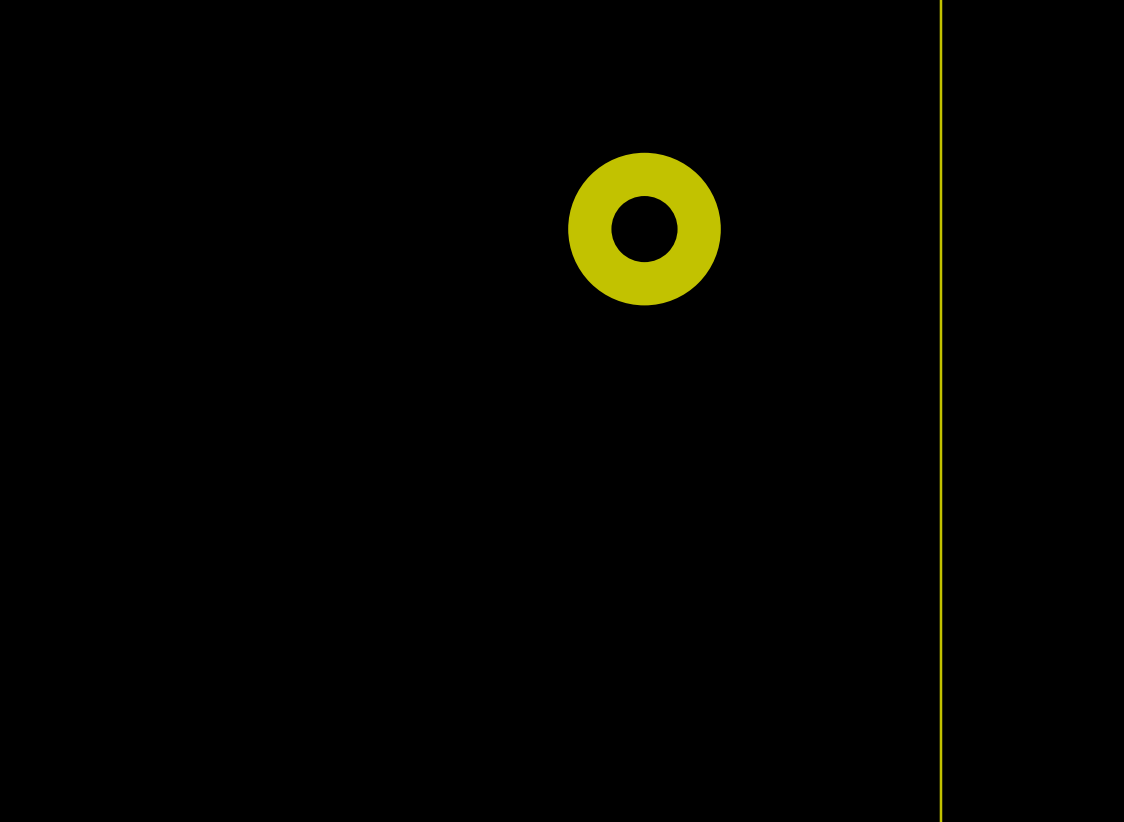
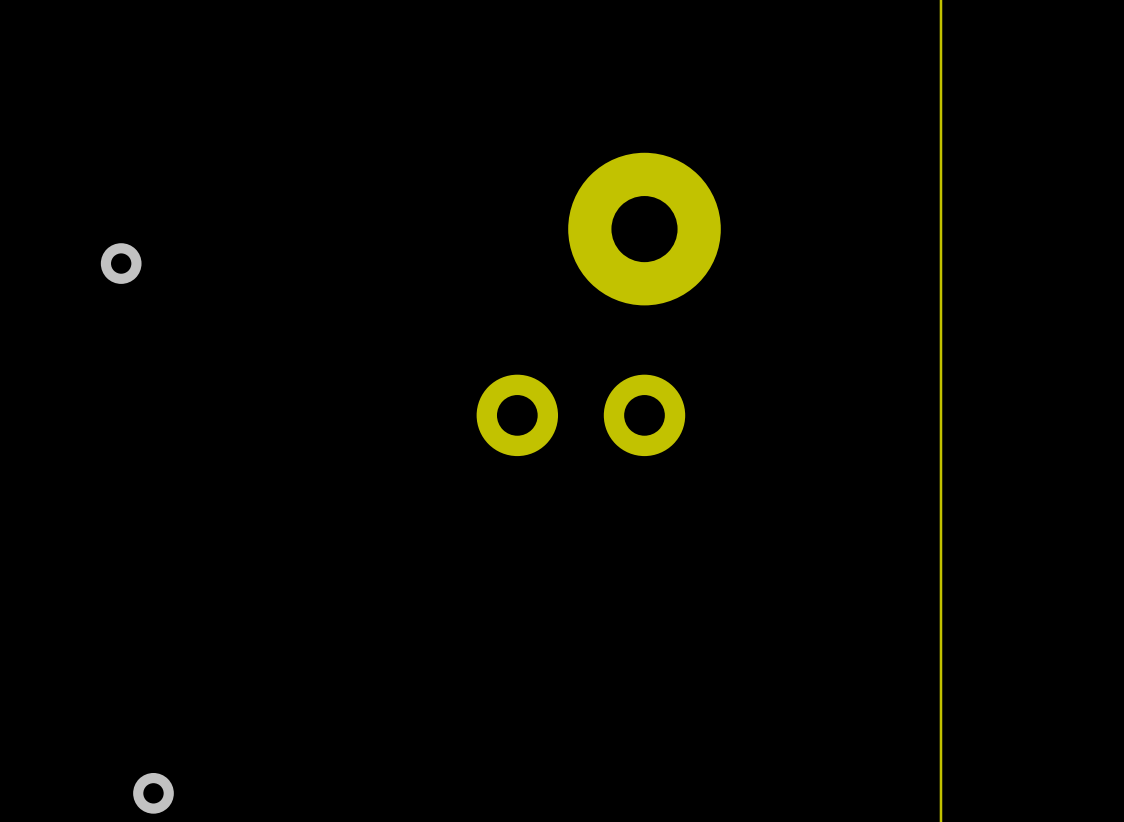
via: none -> (121, 263)
part: none -> (580, 415)
via: none -> (153, 793)

